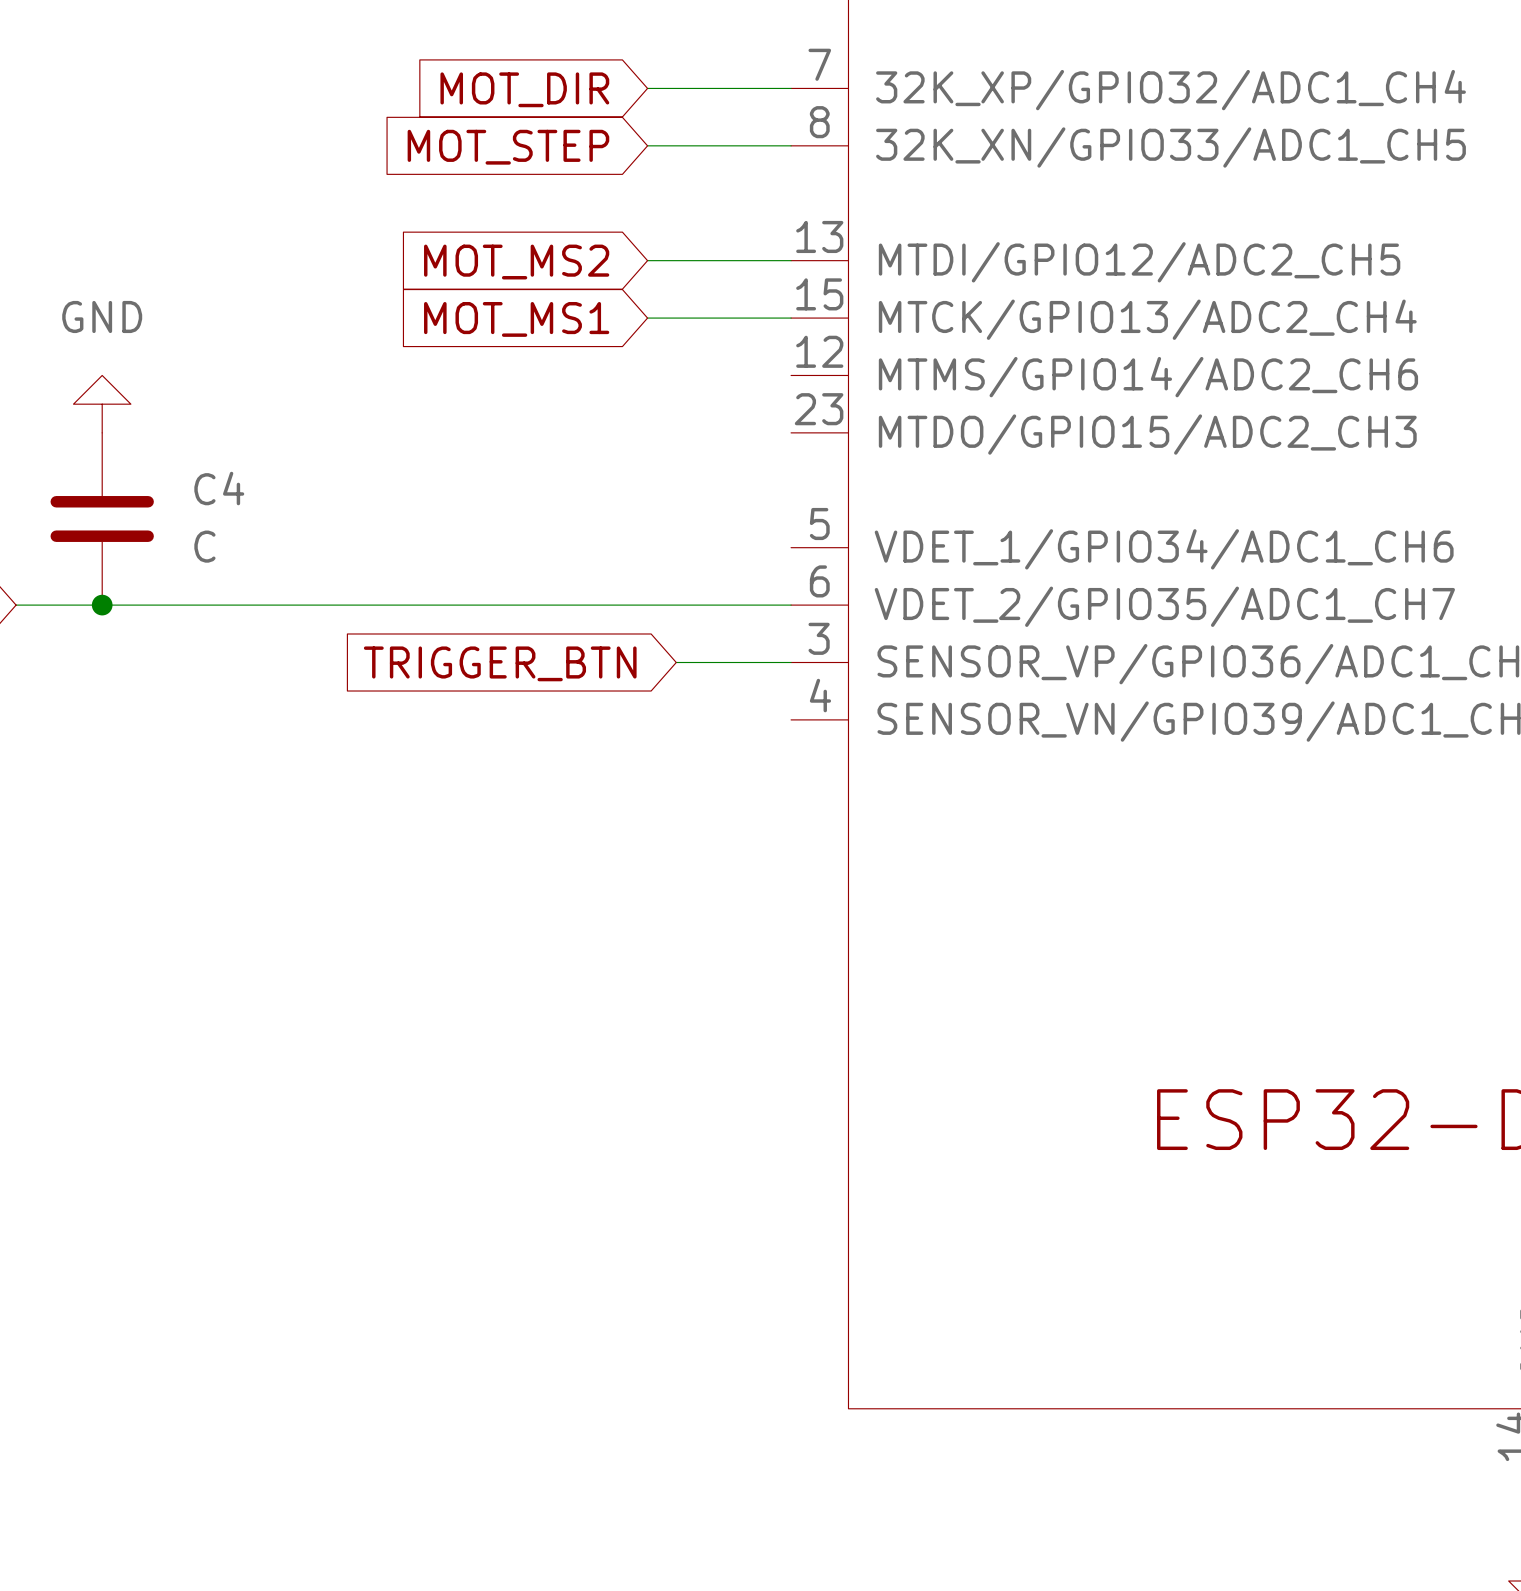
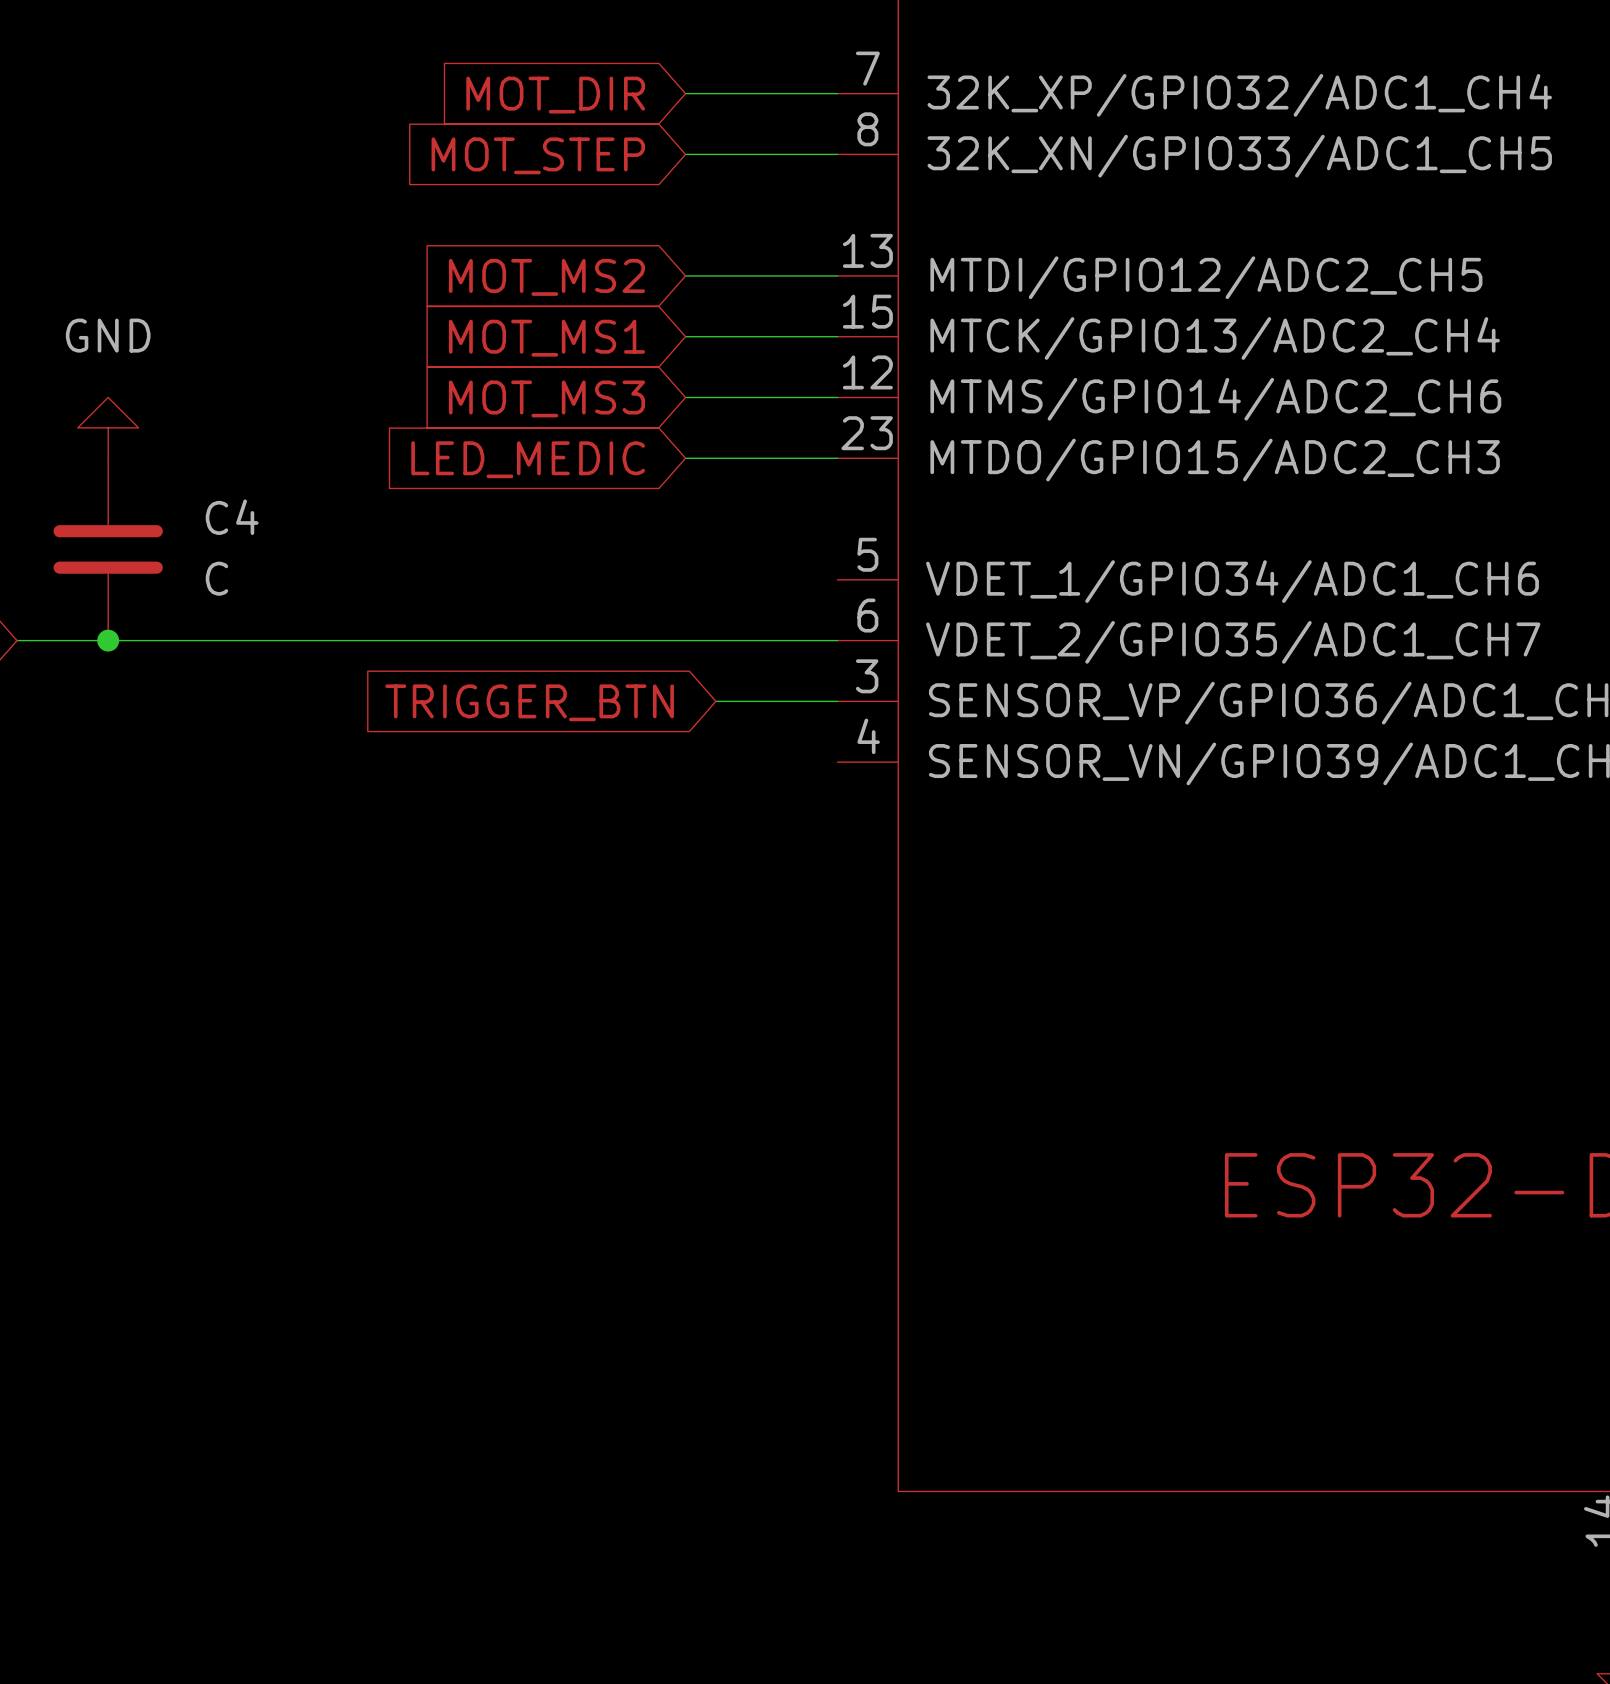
wire: none -> (685, 397) (837, 397)
global label: none -> MOT_MS3 (546, 398)
wire: none -> (685, 458) (837, 458)
global label: none -> LED_MEDIC (528, 459)

